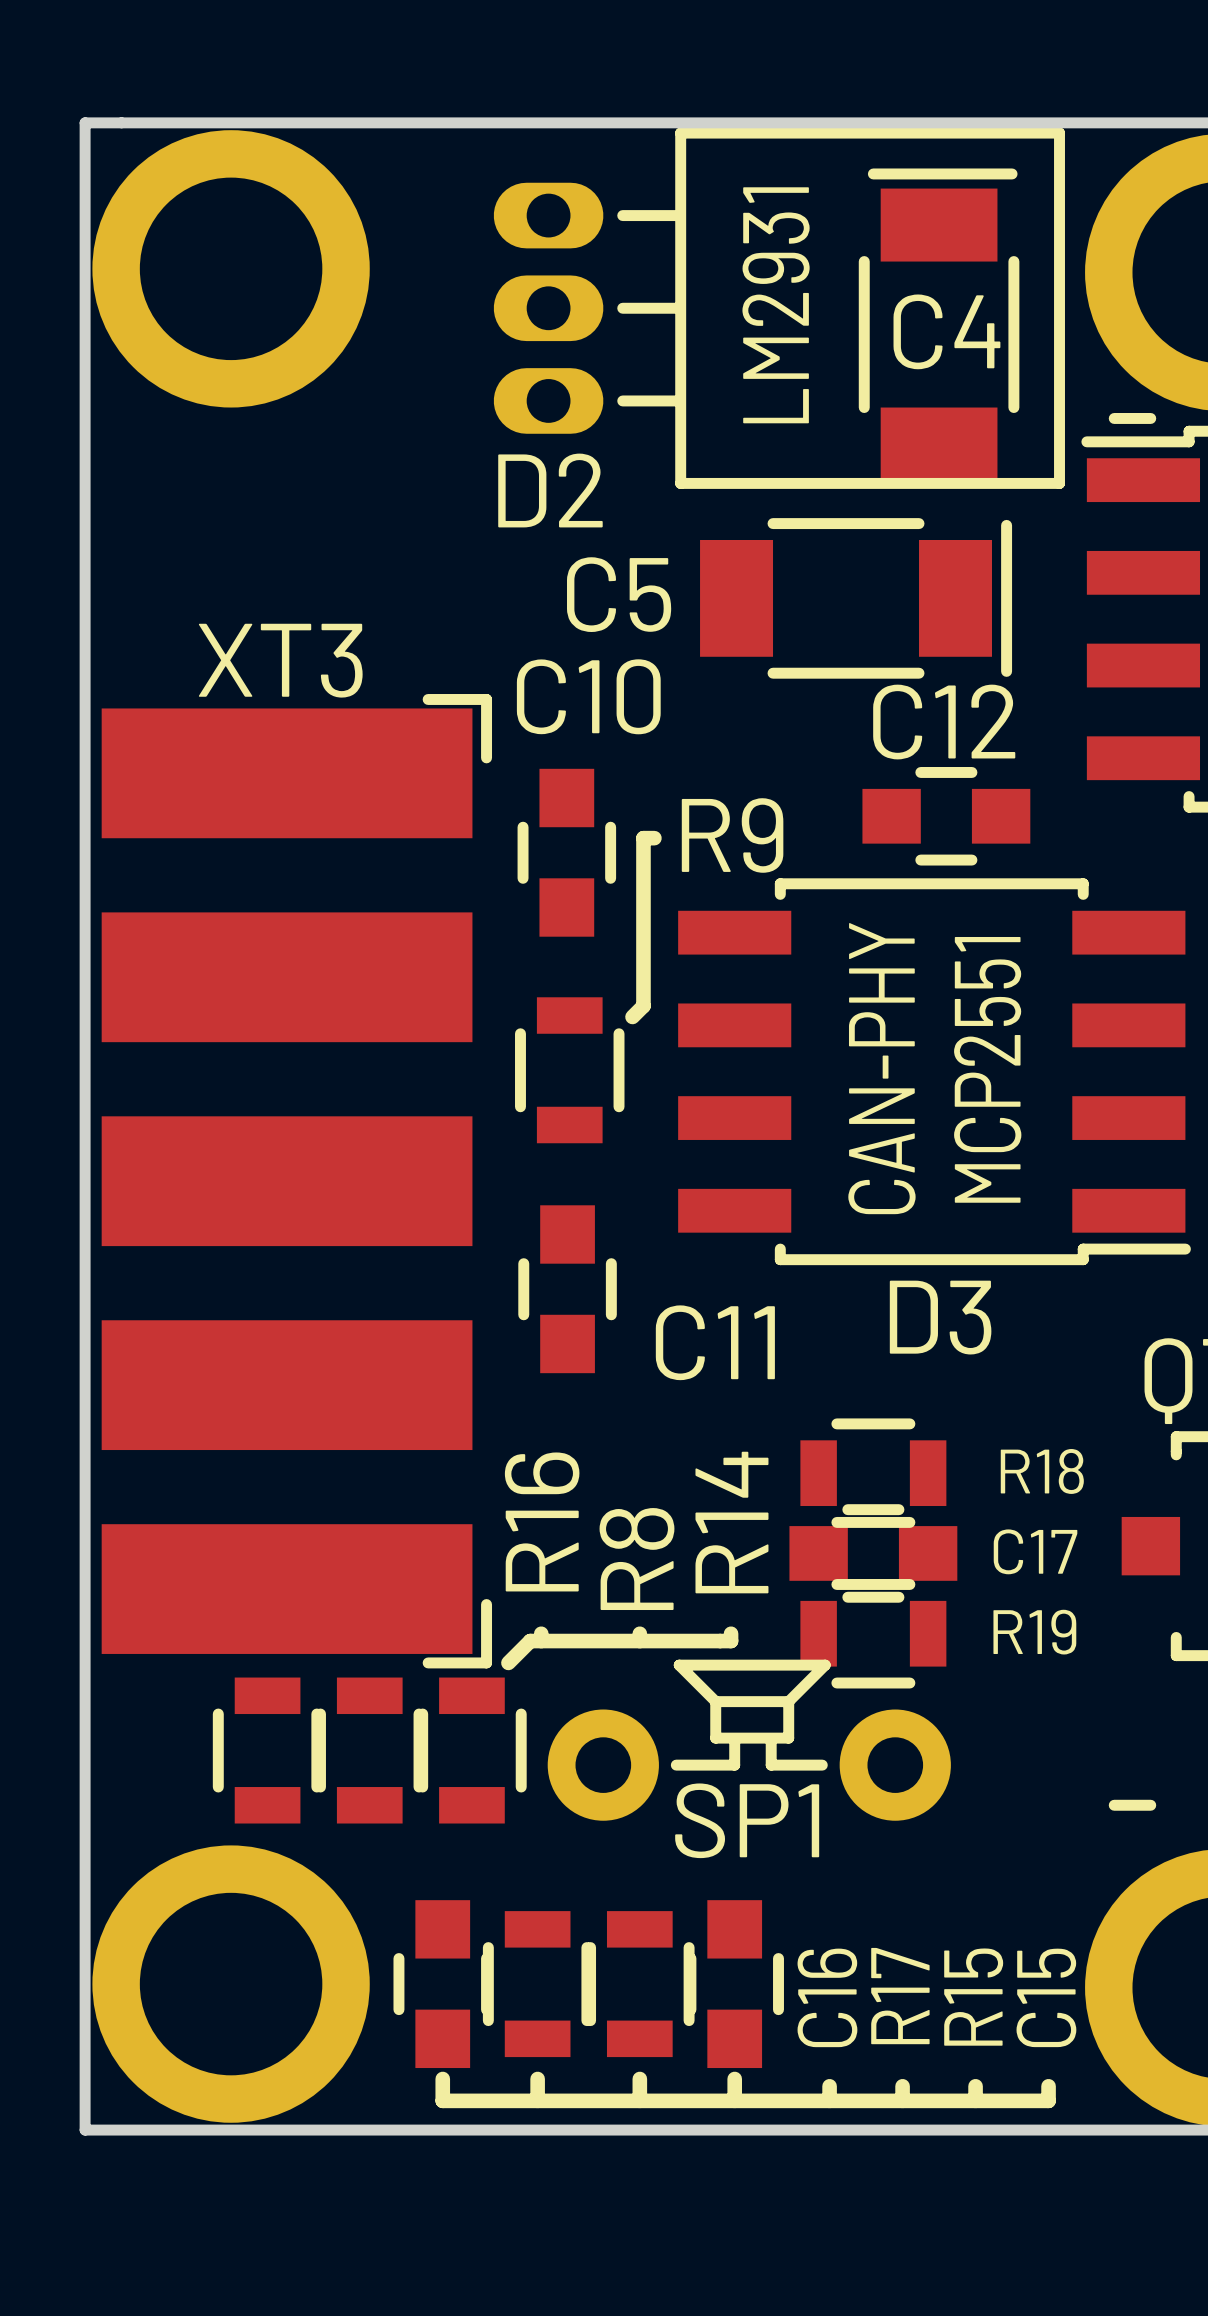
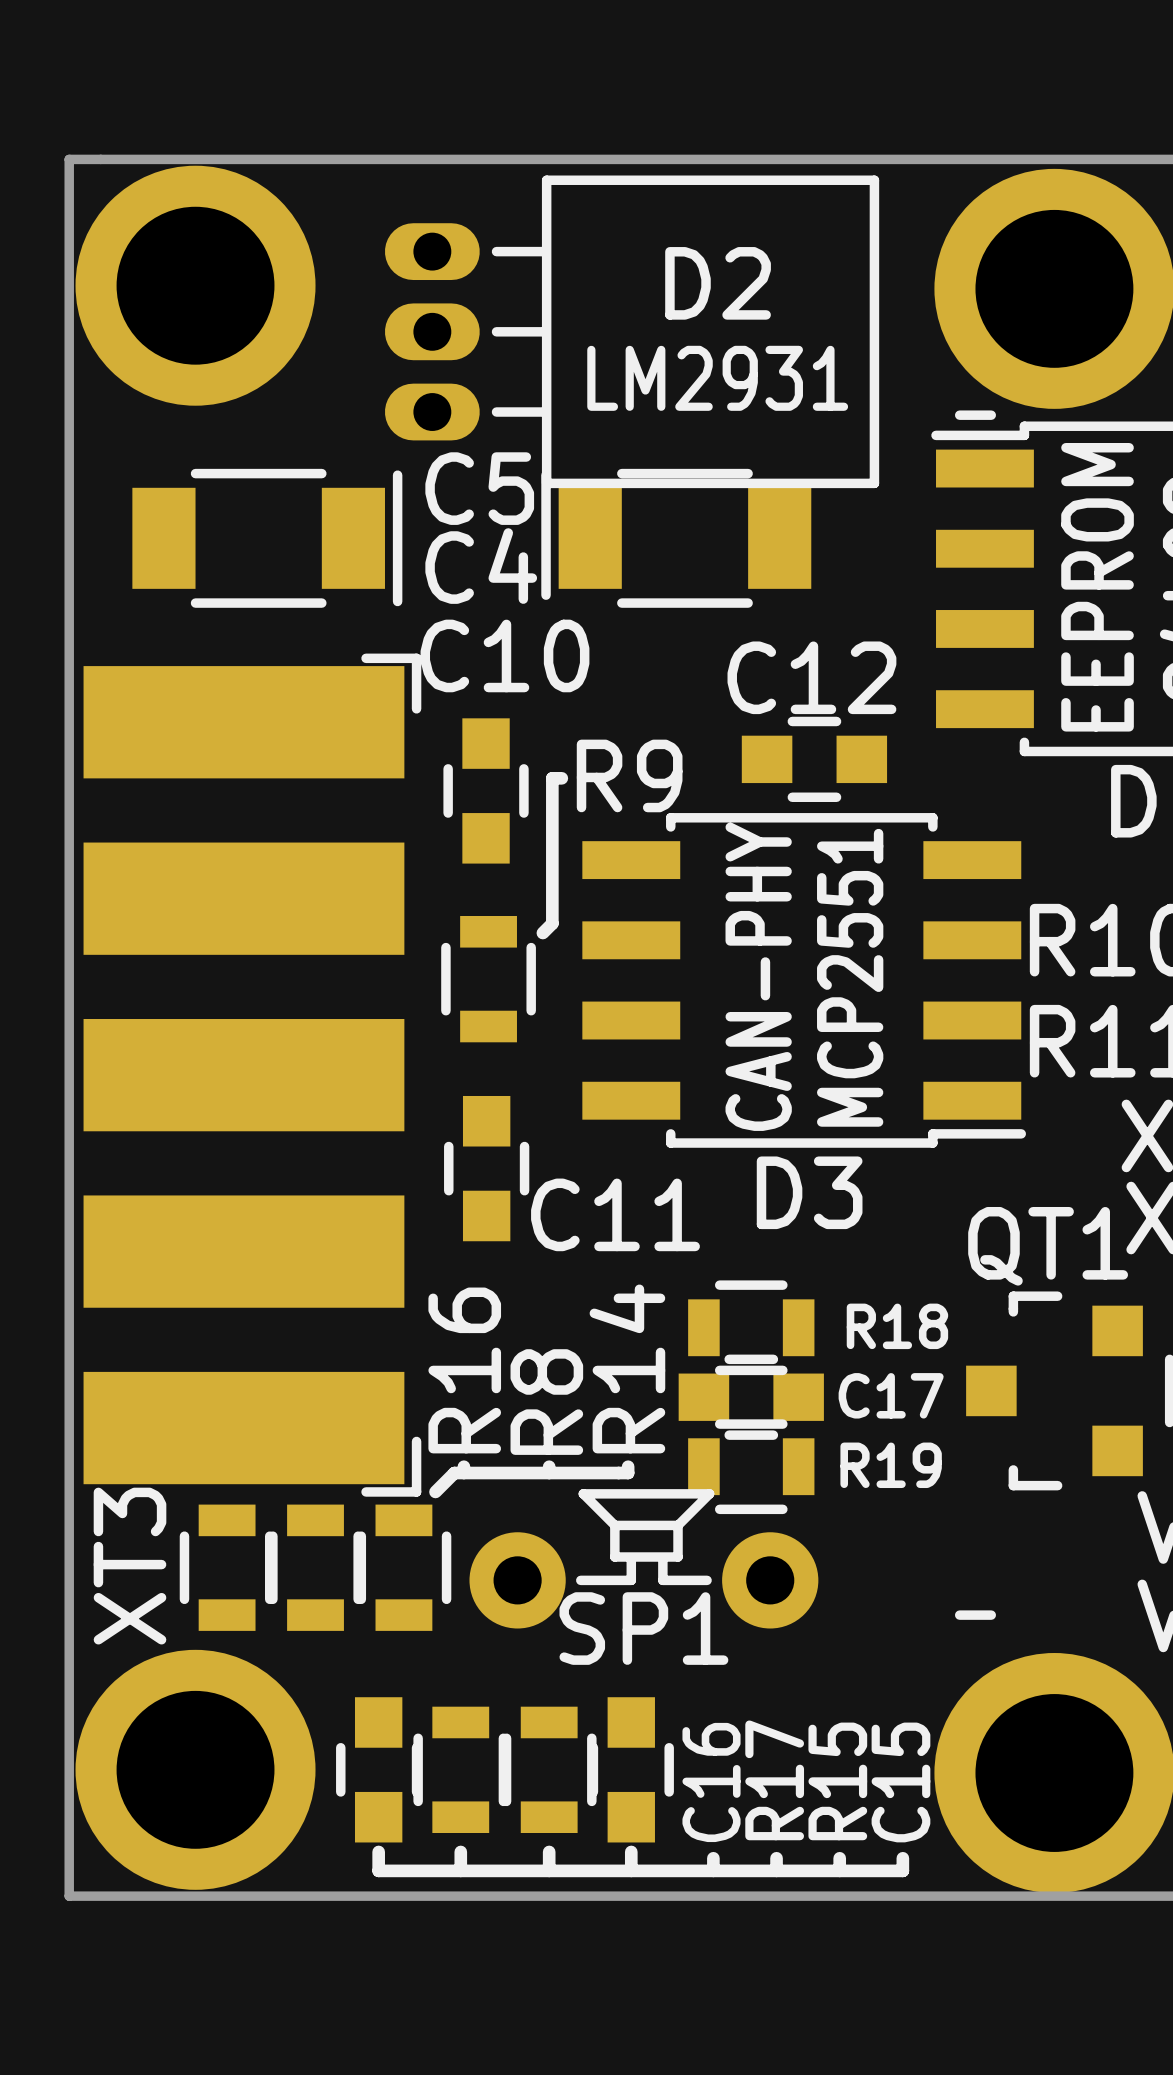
text rotation: 0° (776, 305) -> 90° clockwise (717, 378)
D2 position: (779, 308) -> (632, 331)
C4 rotation: 0° (939, 324) -> 90° counterclockwise (676, 538)
C4 position: (939, 324) -> (676, 538)
C4 name position: C4 (946, 331) -> C4 (481, 566)
D2 name position: D2 (550, 490) -> D2 (718, 283)
C5 name position: C5 (619, 594) -> C5 (479, 488)
C5 position: (856, 598) -> (267, 538)
XT3 name rotation: 0° (280, 660) -> 90° counterclockwise (130, 1566)
XT3 name position: XT3 (280, 660) -> XT3 (130, 1566)

